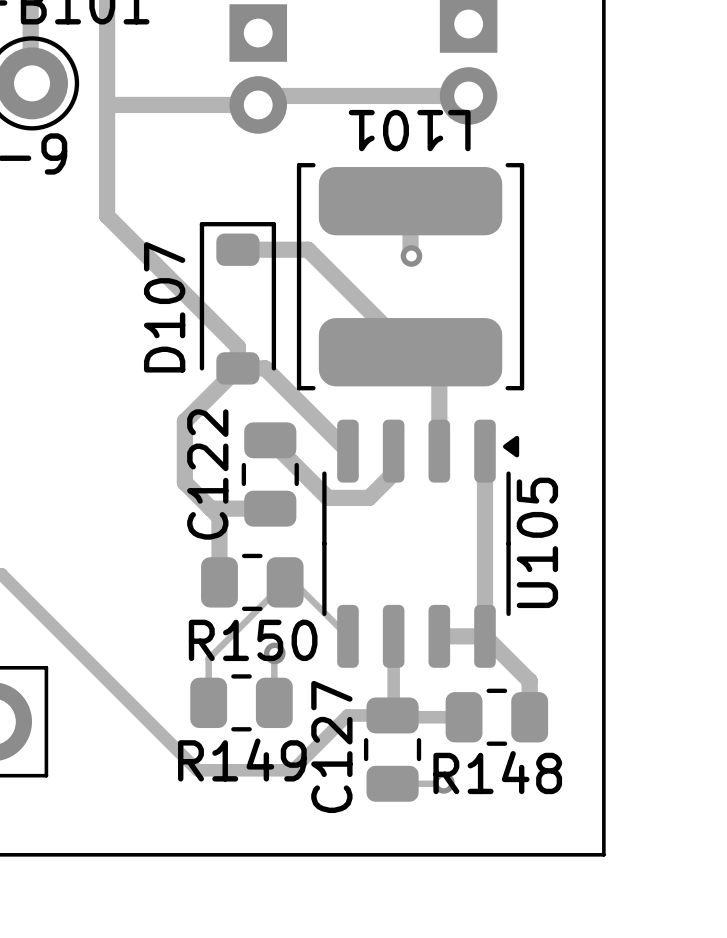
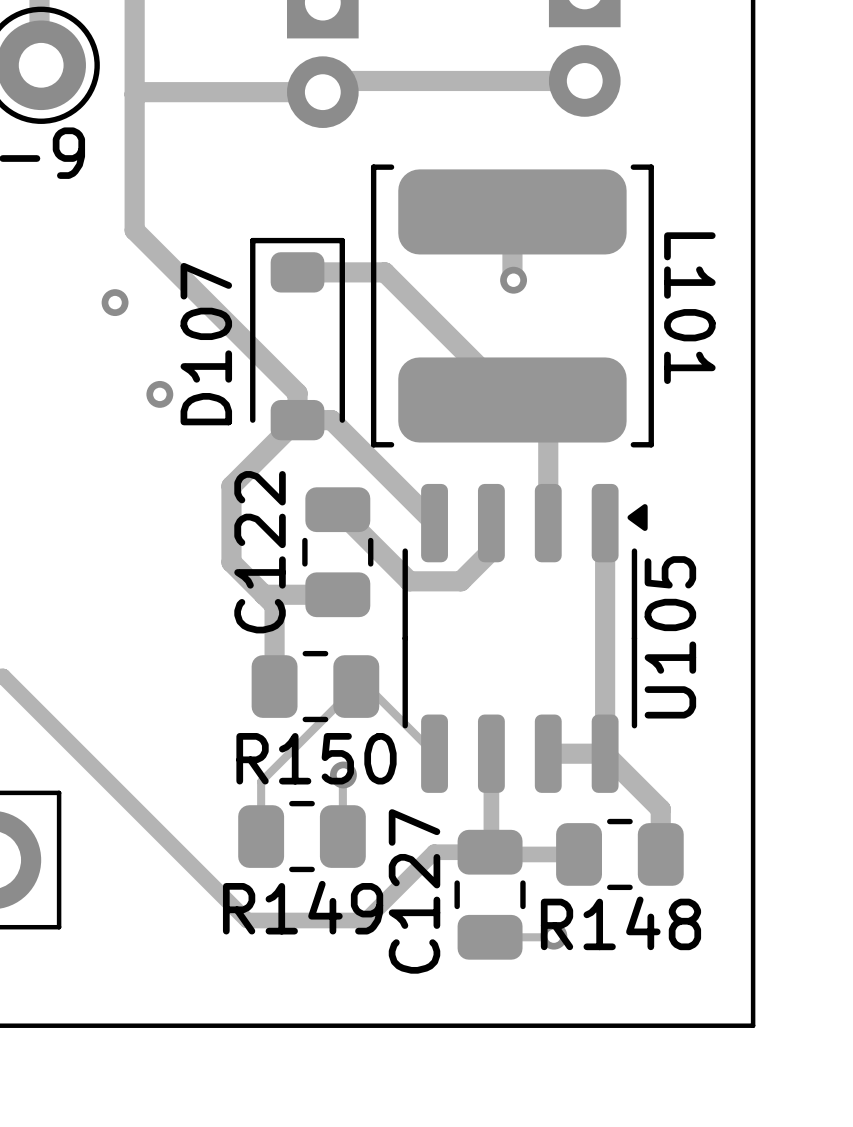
L101 name rotation: 0° (409, 130) -> 90° counterclockwise (689, 308)
L101 name position: L101 (409, 130) -> L101 (689, 308)
via: none -> (115, 302)
via: none -> (159, 394)

